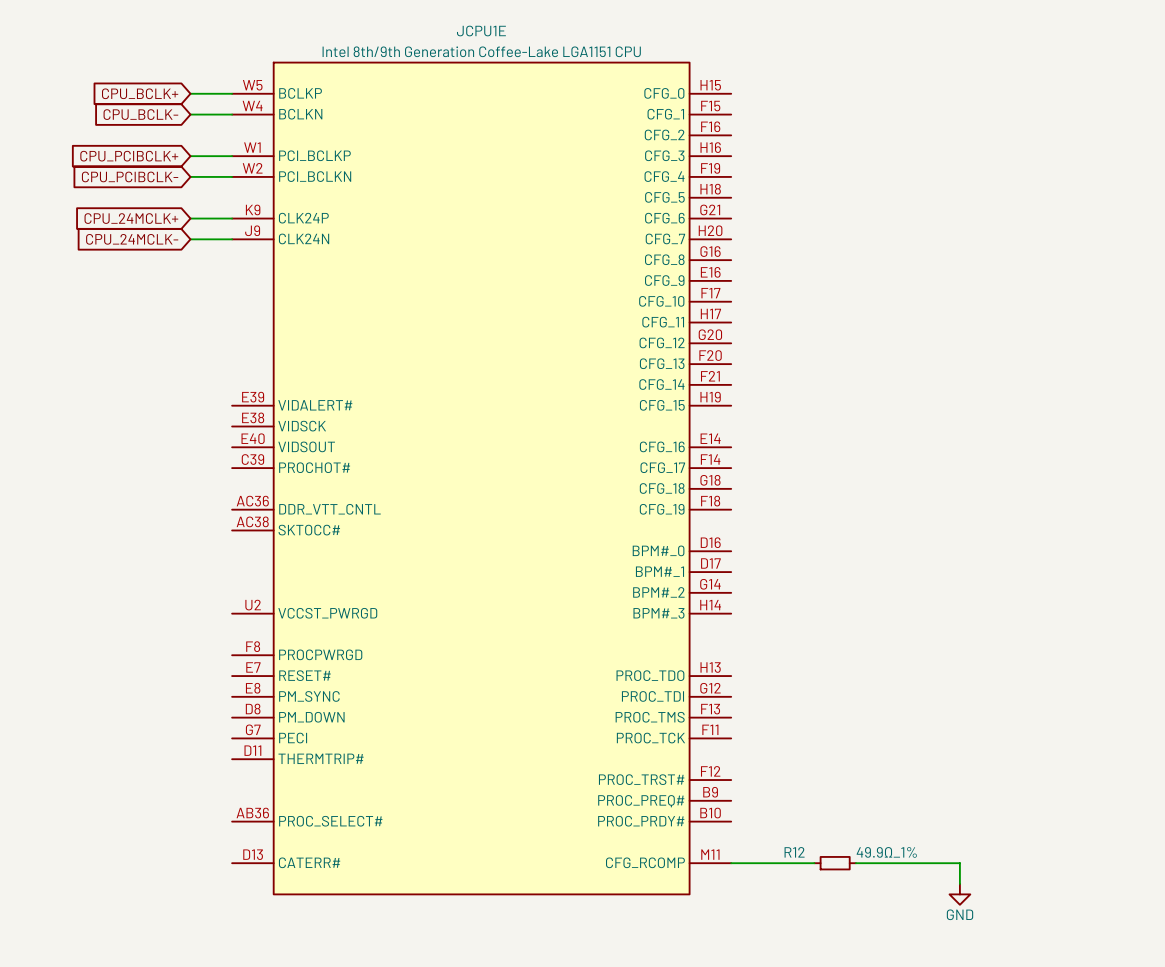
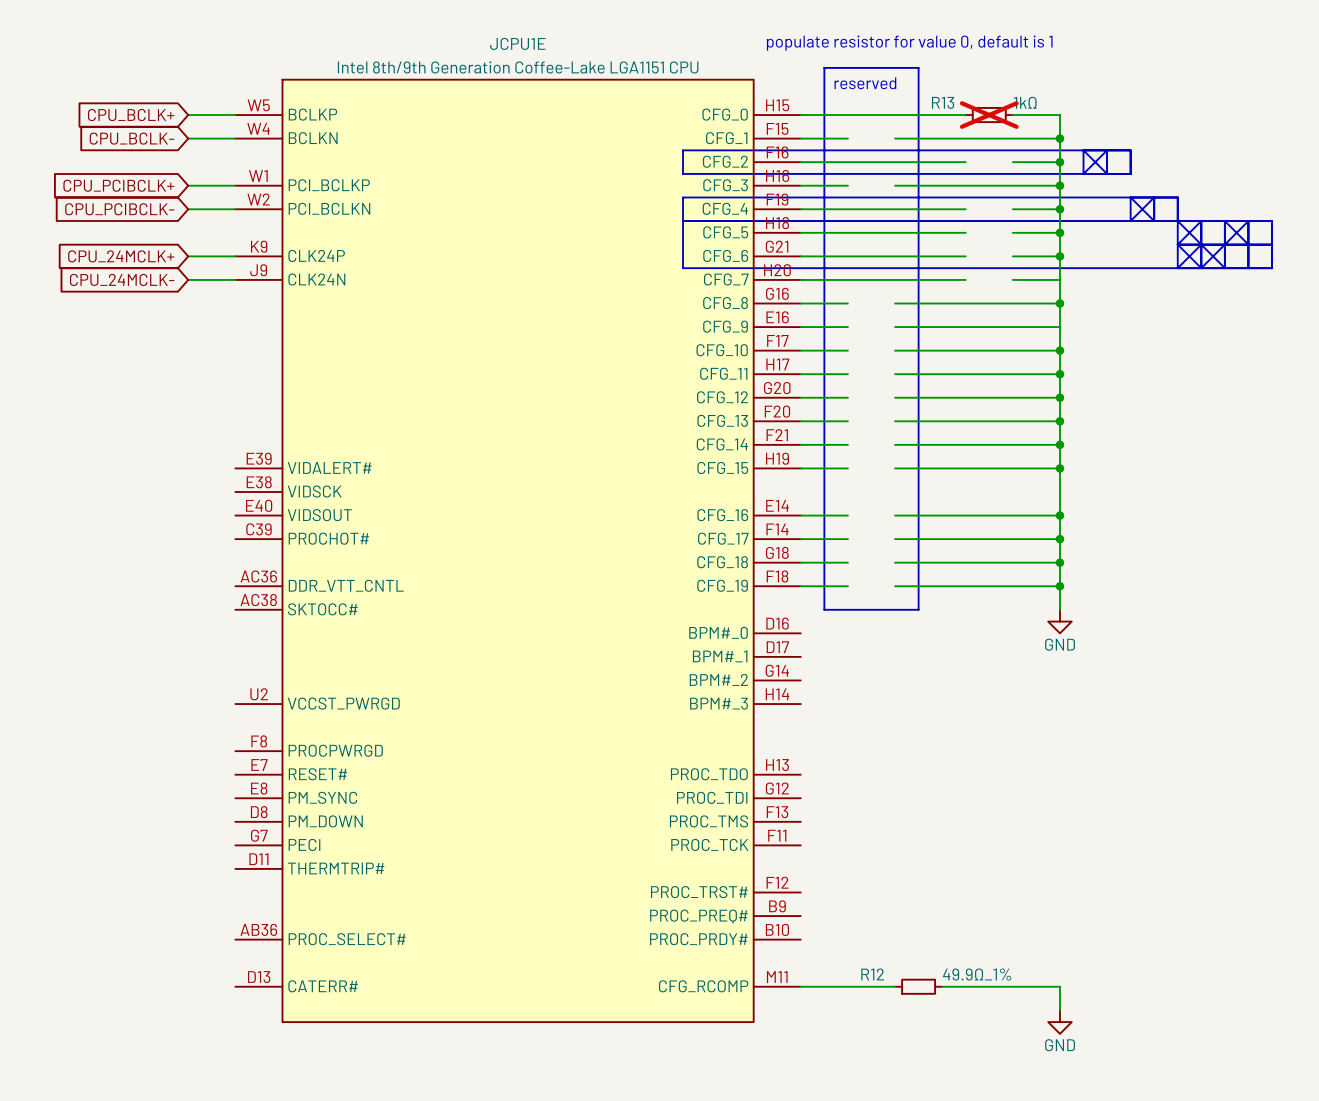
text: none -> populate resistor for value 0, default is 1 (909, 43)
line: none -> (824, 67) (918, 67) (918, 609) (824, 609) (824, 67)
text: none -> reserved (865, 83)
wire: none -> (800, 115) (965, 115)
R13: none -> 1kΩ (989, 115)
wire: none -> (1012, 115) (1059, 115) (1059, 609)
wire: none -> (800, 138) (847, 138)
wire: none -> (895, 138) (1059, 138)
junction: none -> (1059, 138)
line: none -> (683, 150) (1130, 150) (1130, 173) (683, 173) (683, 150)
line: none -> (1083, 150) (1083, 173) (1107, 150) (1107, 173) (1083, 150)
wire: none -> (800, 162) (965, 162)
wire: none -> (1012, 162) (1059, 162)
junction: none -> (1059, 162)
wire: none -> (800, 185) (847, 185)
wire: none -> (895, 185) (1059, 185)
junction: none -> (1059, 185)
line: none -> (1130, 197) (1130, 221) (1154, 197) (1154, 221) (1130, 197)
wire: none -> (800, 209) (965, 209)
wire: none -> (1012, 209) (1059, 209)
junction: none -> (1059, 209)
line: none -> (683, 221) (1272, 221) (1272, 268) (683, 268) (683, 197) (1177, 197) (1177, 268) (1201, 244)
line: none -> (1177, 221) (1224, 268) (1224, 221) (1248, 244)
wire: none -> (800, 232) (965, 232)
wire: none -> (1012, 232) (1059, 232)
junction: none -> (1059, 232)
line: none -> (1177, 244) (1272, 244)
line: none -> (1177, 244) (1201, 268)
line: none -> (1177, 244) (1201, 221) (1201, 268)
wire: none -> (800, 256) (965, 256)
wire: none -> (1012, 256) (1059, 256)
junction: none -> (1059, 256)
line: none -> (1201, 268) (1248, 221) (1248, 268)
wire: none -> (800, 279) (965, 279)
wire: none -> (1012, 279) (1059, 279)
wire: none -> (800, 303) (847, 303)
wire: none -> (895, 303) (1059, 303)
junction: none -> (1059, 303)
wire: none -> (800, 327) (847, 327)
wire: none -> (895, 327) (1059, 327)
wire: none -> (800, 350) (847, 350)
wire: none -> (895, 350) (1059, 350)
junction: none -> (1059, 350)
wire: none -> (800, 374) (847, 374)
wire: none -> (895, 374) (1059, 374)
junction: none -> (1059, 374)
wire: none -> (800, 397) (847, 397)
wire: none -> (895, 397) (1059, 397)
junction: none -> (1059, 397)
wire: none -> (800, 421) (847, 421)
wire: none -> (895, 421) (1059, 421)
junction: none -> (1059, 421)
wire: none -> (800, 444) (847, 444)
wire: none -> (895, 444) (1059, 444)
junction: none -> (1059, 444)
wire: none -> (800, 468) (847, 468)
wire: none -> (895, 468) (1059, 468)
junction: none -> (1059, 468)
wire: none -> (800, 515) (847, 515)
wire: none -> (895, 515) (1059, 515)
junction: none -> (1059, 515)
wire: none -> (800, 539) (847, 539)
wire: none -> (895, 539) (1059, 539)
junction: none -> (1059, 539)
wire: none -> (800, 562) (847, 562)
wire: none -> (895, 562) (1059, 562)
junction: none -> (1059, 562)
wire: none -> (800, 586) (847, 586)
wire: none -> (895, 586) (1059, 586)
junction: none -> (1059, 586)
power symbol: none -> GND (1059, 621)

